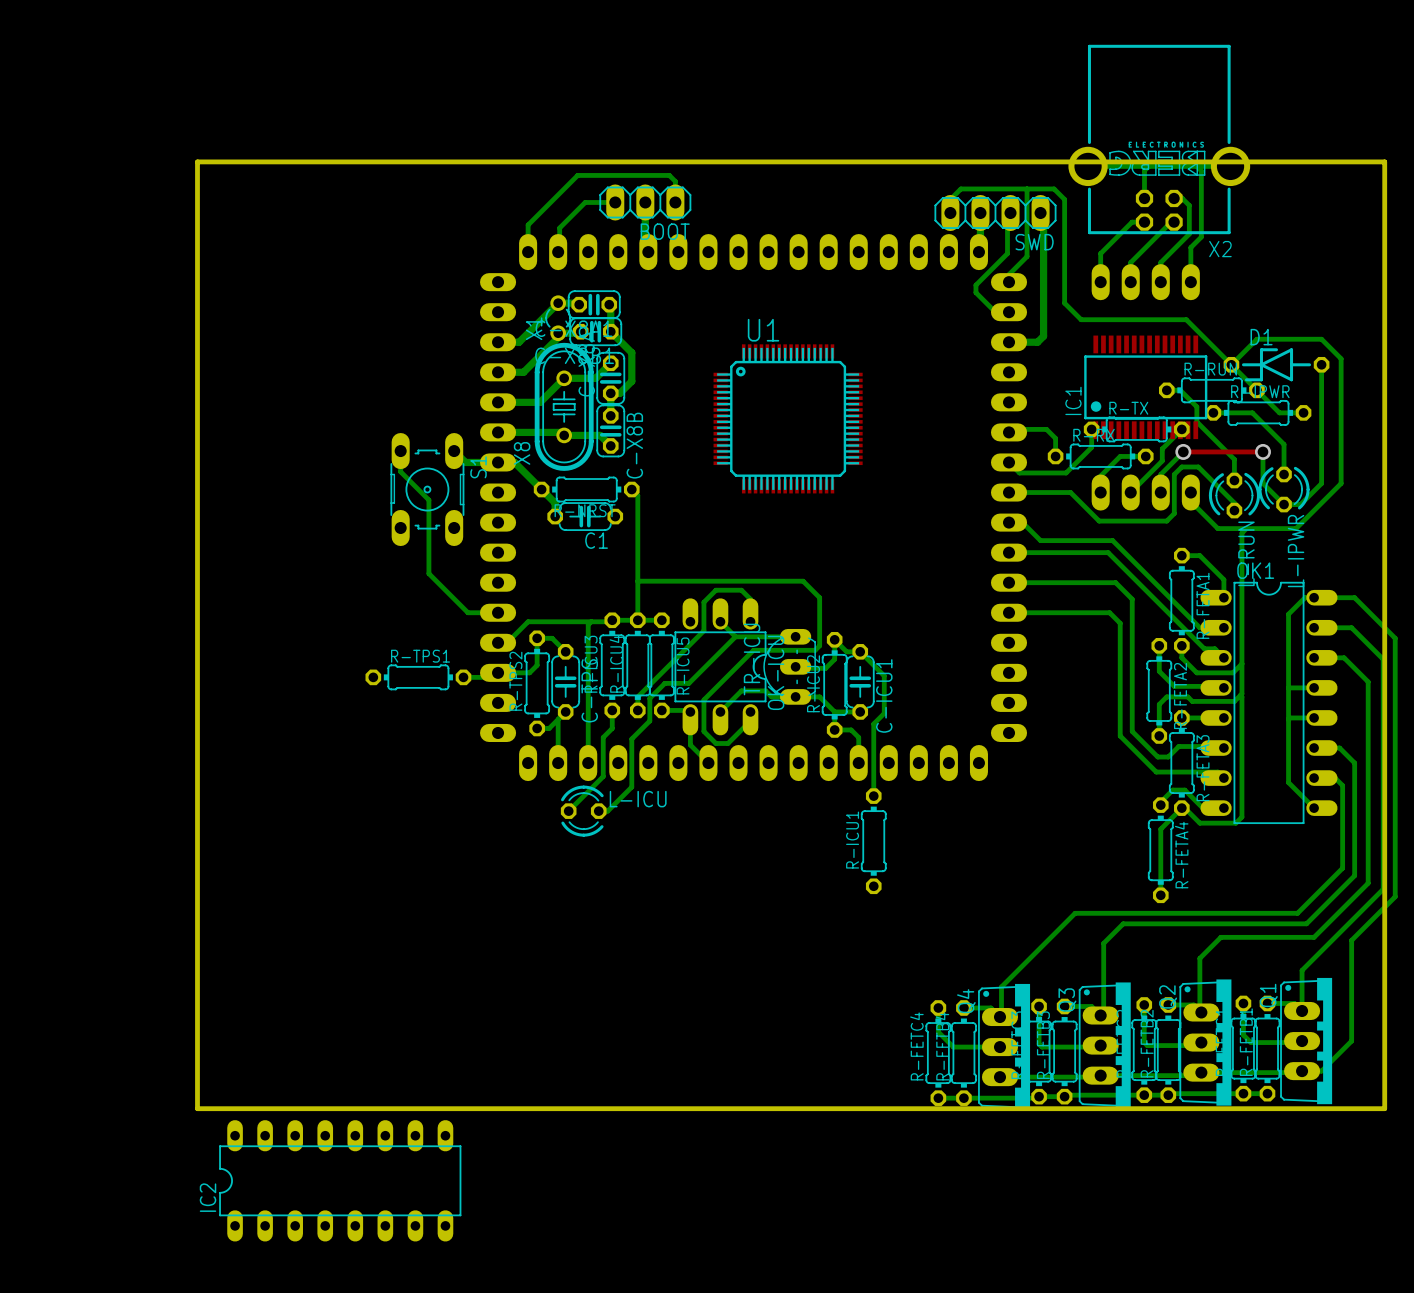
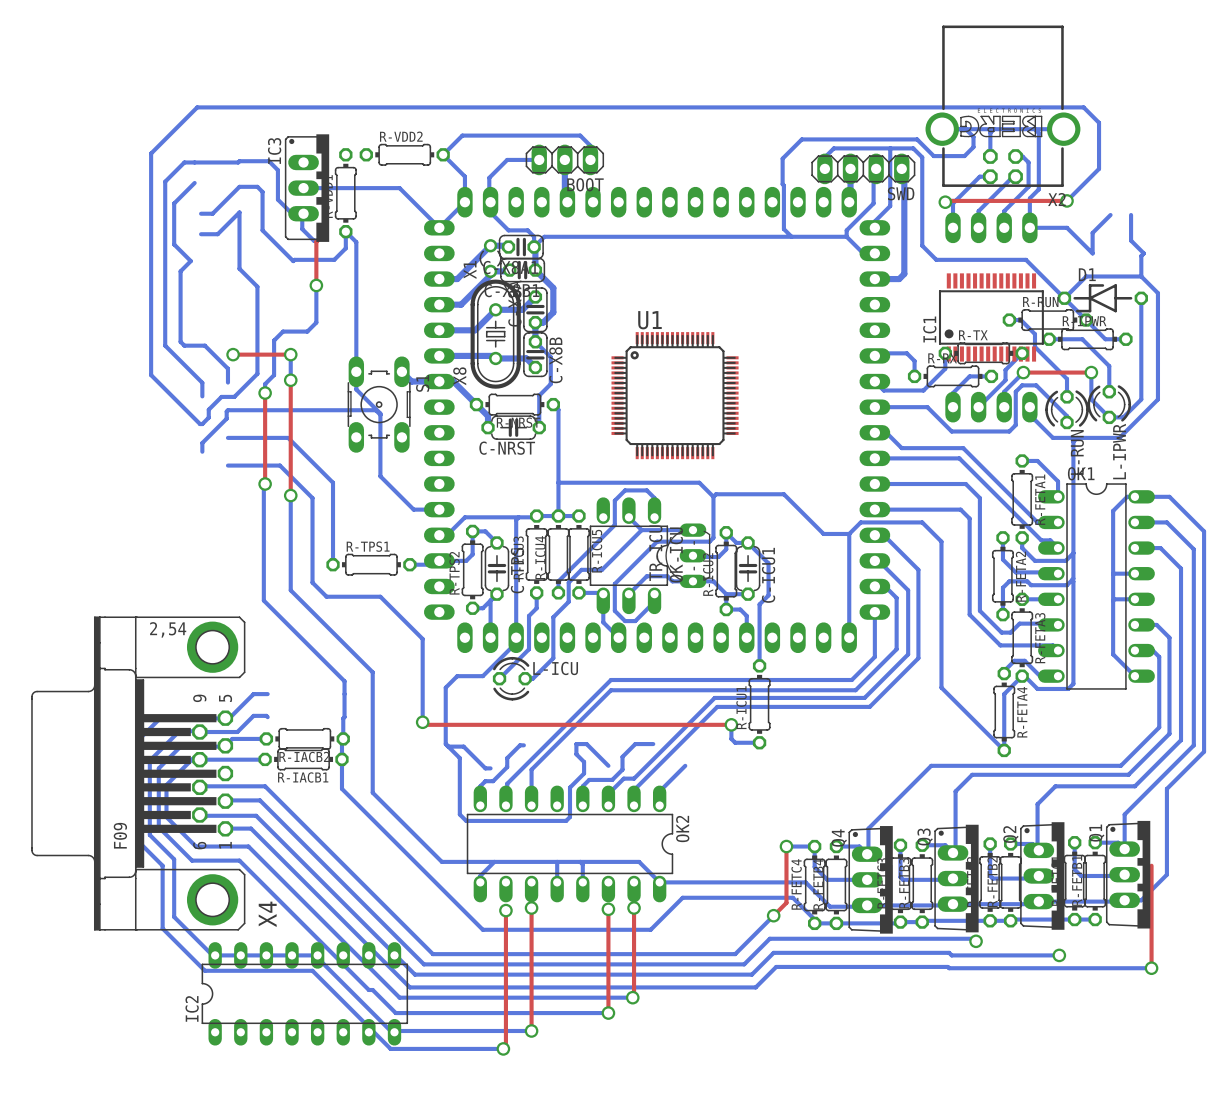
board edge: (197, 161) (1384, 161) (1384, 1108) (197, 1108) (197, 161) -> none
bottom track: none -> (965, 129) (973, 136) (973, 147) (964, 156) (933, 156) (917, 139) (801, 139) (782, 158) (783, 229) (791, 236)
bottom track: (675, 185) (675, 181) (669, 175) (577, 175) (528, 225) -> (590, 145) (580, 135) (462, 135) (443, 154) (464, 176) (464, 179)
R-VDD2: none -> (404, 154)
bottom track: (585, 202) (559, 228) (558, 252) -> (513, 159) (507, 159) (489, 177) (490, 212) (508, 230) (527, 230) (534, 236) (534, 247) (544, 236) (846, 236)
bottom track: none -> (194, 182) (174, 203) (174, 244) (190, 261) (180, 271) (180, 341) (184, 345) (204, 345) (227, 368) (227, 382)
bottom track: none -> (303, 188) (399, 188) (439, 227) (464, 202)
IC3: none -> (307, 188)
part: none -> (345, 193)
top track: none -> (944, 200) (1067, 200)
bottom track: none -> (1067, 200) (1099, 168) (1099, 122) (1083, 107) (197, 107) (151, 153) (151, 375) (200, 424) (202, 424) (208, 417) (208, 409) (221, 396) (234, 396) (257, 373) (257, 286) (239, 268) (239, 212) (217, 234) (201, 234)
via: none -> (1067, 200)
via: none -> (945, 202)
bottom track: none -> (201, 213) (212, 213) (239, 186) (257, 186) (262, 191) (262, 230) (293, 261) (334, 259) (345, 248) (345, 231) (356, 242) (356, 371)
bottom track: none -> (1110, 215) (1092, 232) (1092, 253) (1067, 227) (1029, 227)
bottom track: none -> (1131, 215) (1131, 240) (1143, 253) (1141, 256) (1141, 276)
bottom track: none -> (317, 240) (313, 240) (302, 229) (303, 213) (292, 213) (277, 199) (277, 170) (268, 161) (184, 162) (165, 181) (165, 345) (202, 382) (202, 396)
top track: none -> (317, 240) (316, 285)
bottom track: none -> (316, 285) (316, 322) (307, 331) (283, 331) (274, 340) (274, 375) (265, 384) (265, 393)
via: none -> (316, 285)
bottom track: none -> (535, 341) (550, 357) (550, 384) (539, 395) (539, 427)
U1 position: (788, 418) -> (675, 395)
top track: none -> (233, 354) (290, 354)
via: none -> (233, 354)
bottom track: none -> (290, 354) (290, 380)
via: none -> (290, 354)
top track: none -> (290, 380) (290, 495)
via: none -> (290, 380)
top track: none -> (265, 393) (265, 484)
via: none -> (265, 393)
bottom track: none -> (380, 414) (375, 410) (227, 410) (226, 418) (202, 443) (202, 451)
bottom track: none -> (227, 437) (288, 437) (333, 482) (333, 564)
C1 name: C1 (596, 540) -> C-NRST (507, 448)
bottom track: none -> (227, 465) (279, 465) (312, 498) (312, 582) (326, 596) (380, 596) (422, 639) (422, 722)
bottom track: none -> (265, 484) (263, 600) (344, 681) (341, 788) (482, 929) (650, 929) (682, 897) (792, 897) (814, 919) (814, 923)
via: none -> (265, 484)
bottom track: none -> (290, 495) (290, 590) (372, 672) (372, 792) (441, 861) (639, 861) (659, 882) (805, 882) (830, 906) (867, 905)
via: none -> (290, 495)
bottom track: none -> (713, 496) (716, 494) (783, 494) (823, 533) (849, 533)
bottom track: none -> (849, 533) (849, 637)
bottom track: none -> (849, 533) (860, 522) (922, 522) (941, 541) (941, 687) (1004, 750)
bottom track: none -> (874, 535) (883, 535) (918, 569) (918, 658) (869, 706) (717, 706) (634, 790) (634, 805)
bottom track: none -> (874, 560) (878, 560) (908, 590) (908, 654) (864, 697) (714, 697) (634, 778) (623, 778) (608, 794) (608, 805)
bottom track: none -> (874, 586) (885, 586) (896, 598) (896, 649) (855, 690) (610, 690) (531, 769) (531, 805)
bottom track: none -> (874, 612) (874, 656) (851, 680) (610, 680) (507, 783) (505, 805)
bottom track: none -> (516, 637) (516, 642) (482, 676) (457, 676) (445, 687) (445, 744) (459, 758) (459, 814) (466, 820) (566, 820) (569, 817) (569, 787) (584, 773) (584, 761) (576, 754) (576, 744) (586, 744) (608, 765)
bottom track: none -> (267, 694) (253, 694) (229, 718) (160, 718) (140, 737) (140, 843) (162, 865) (162, 928) (204, 970) (312, 970) (390, 1048) (503, 1048)
bottom track: none -> (267, 717) (253, 715) (237, 732) (179, 731) (149, 760) (149, 835) (174, 859) (174, 916) (212, 955) (315, 955) (390, 1030) (531, 1030)
top track: none -> (422, 722) (425, 724) (731, 724)
via: none -> (422, 722)
bottom track: none -> (731, 724) (731, 738) (735, 742) (759, 742)
via: none -> (731, 724)
bottom track: none -> (266, 738) (232, 738) (224, 746) (180, 746) (158, 768) (158, 827) (192, 860) (239, 860) (368, 990) (372, 990) (395, 1013) (608, 1013)
R-IACB2: none -> (304, 738)
bottom track: none -> (653, 744) (635, 744) (622, 756) (622, 769) (612, 779) (589, 779) (582, 786) (582, 805)
bottom track: none -> (523, 745) (520, 745) (507, 758) (507, 767) (493, 781) (485, 781) (480, 786) (480, 805)
bottom track: none -> (448, 746) (463, 746) (485, 768) (490, 768)
bottom track: none -> (265, 759) (192, 759) (166, 785) (166, 817) (195, 846) (248, 846) (399, 997) (632, 997)
R-IACB1: none -> (303, 759)
bottom track: none -> (685, 765) (659, 791) (659, 805)
X4: none -> (138, 773)
bottom track: none -> (199, 787) (265, 786) (432, 954) (735, 954) (773, 915)
bottom track: none -> (225, 801) (260, 800) (423, 964) (744, 964) (769, 938) (973, 938) (976, 941)
bottom track: none -> (199, 815) (256, 815) (414, 974) (751, 974) (773, 952) (949, 952) (951, 955) (1059, 955)
bottom track: none -> (225, 828) (251, 828) (409, 987) (755, 987) (776, 966) (1151, 968)
OK2: none -> (569, 843)
bottom track: none -> (786, 846) (814, 846)
top track: none -> (786, 846) (786, 902) (773, 915)
via: none -> (786, 846)
bottom track: none -> (494, 861) (480, 875) (480, 882)
bottom track: none -> (557, 861) (557, 882)
bottom track: none -> (580, 861) (582, 864) (582, 882)
top track: none -> (1151, 865) (1151, 968)
top track: none -> (531, 908) (531, 1030)
via: none -> (531, 908)
top track: none -> (634, 908) (632, 997)
via: none -> (634, 908)
top track: none -> (608, 909) (608, 1013)
via: none -> (608, 909)
top track: none -> (505, 910) (505, 1046) (503, 1048)
via: none -> (505, 910)
via: none -> (773, 915)
via: none -> (976, 941)
via: none -> (1059, 955)
via: none -> (1151, 968)
via: none -> (632, 997)
via: none -> (608, 1013)
via: none -> (531, 1030)
via: none -> (503, 1048)

